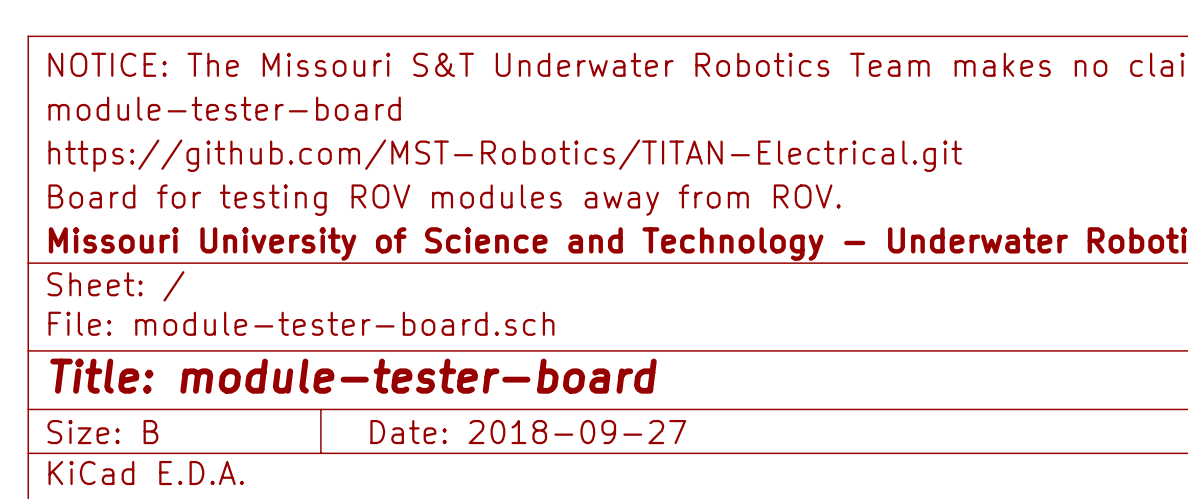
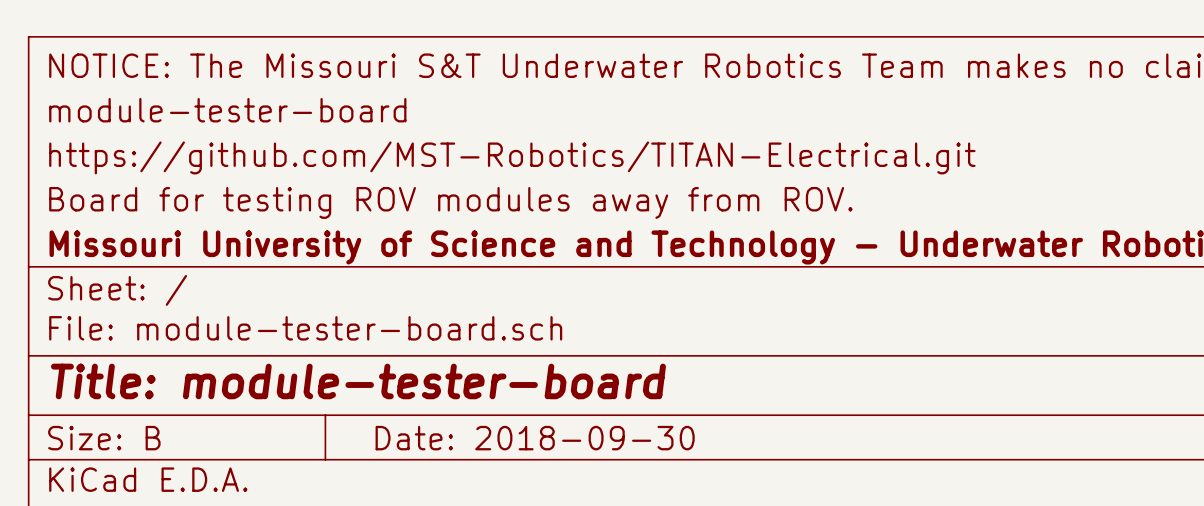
title block: Date: 2018-09-27 (528, 432) -> Date: 2018-09-30 (535, 438)

